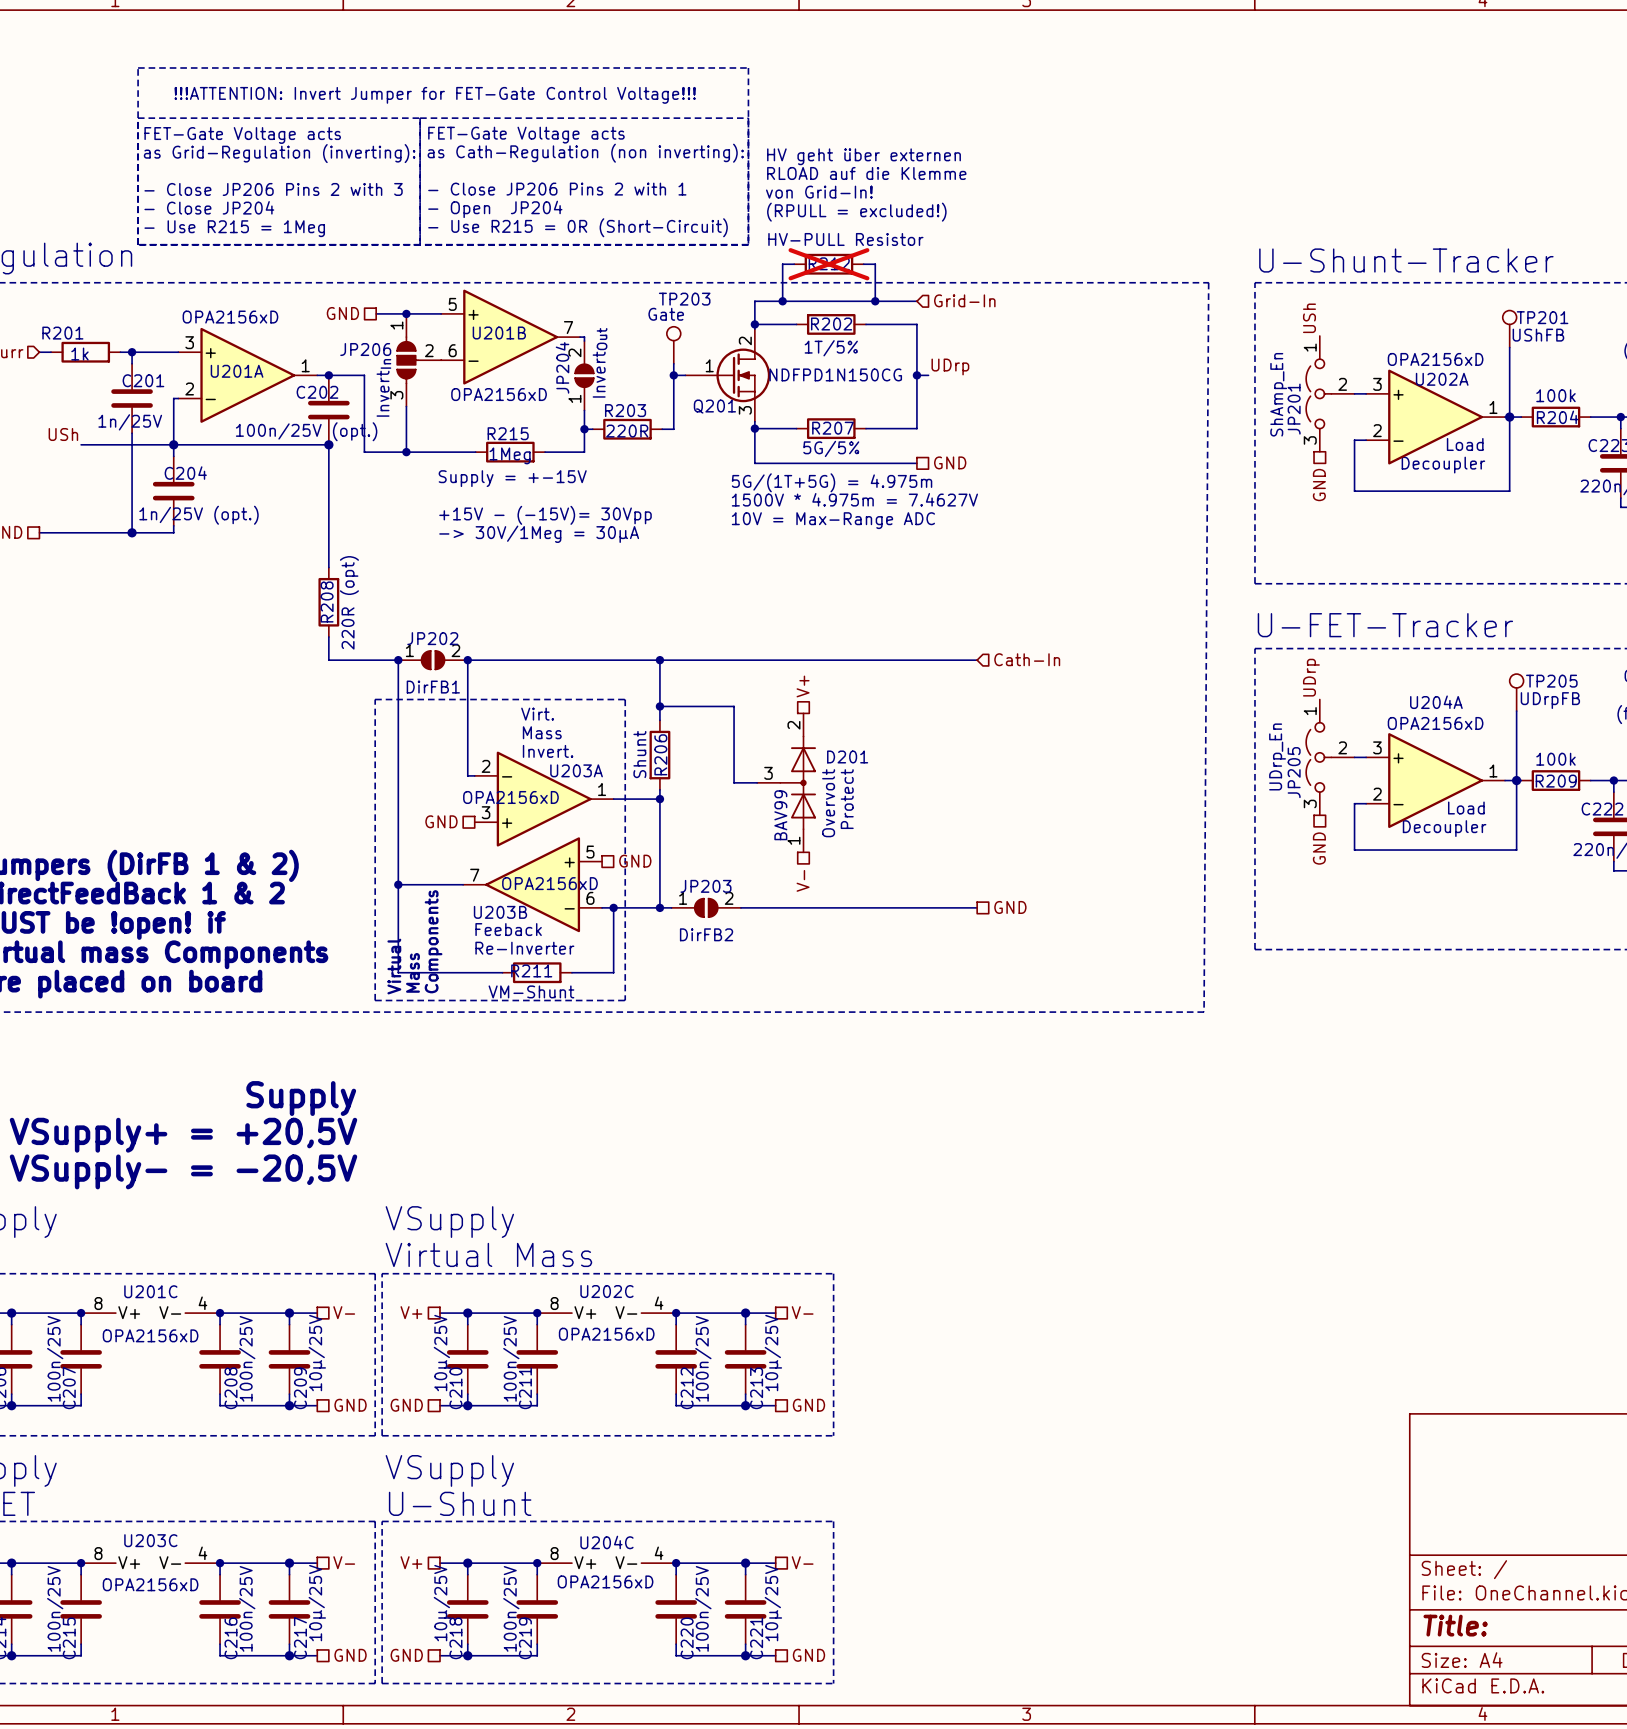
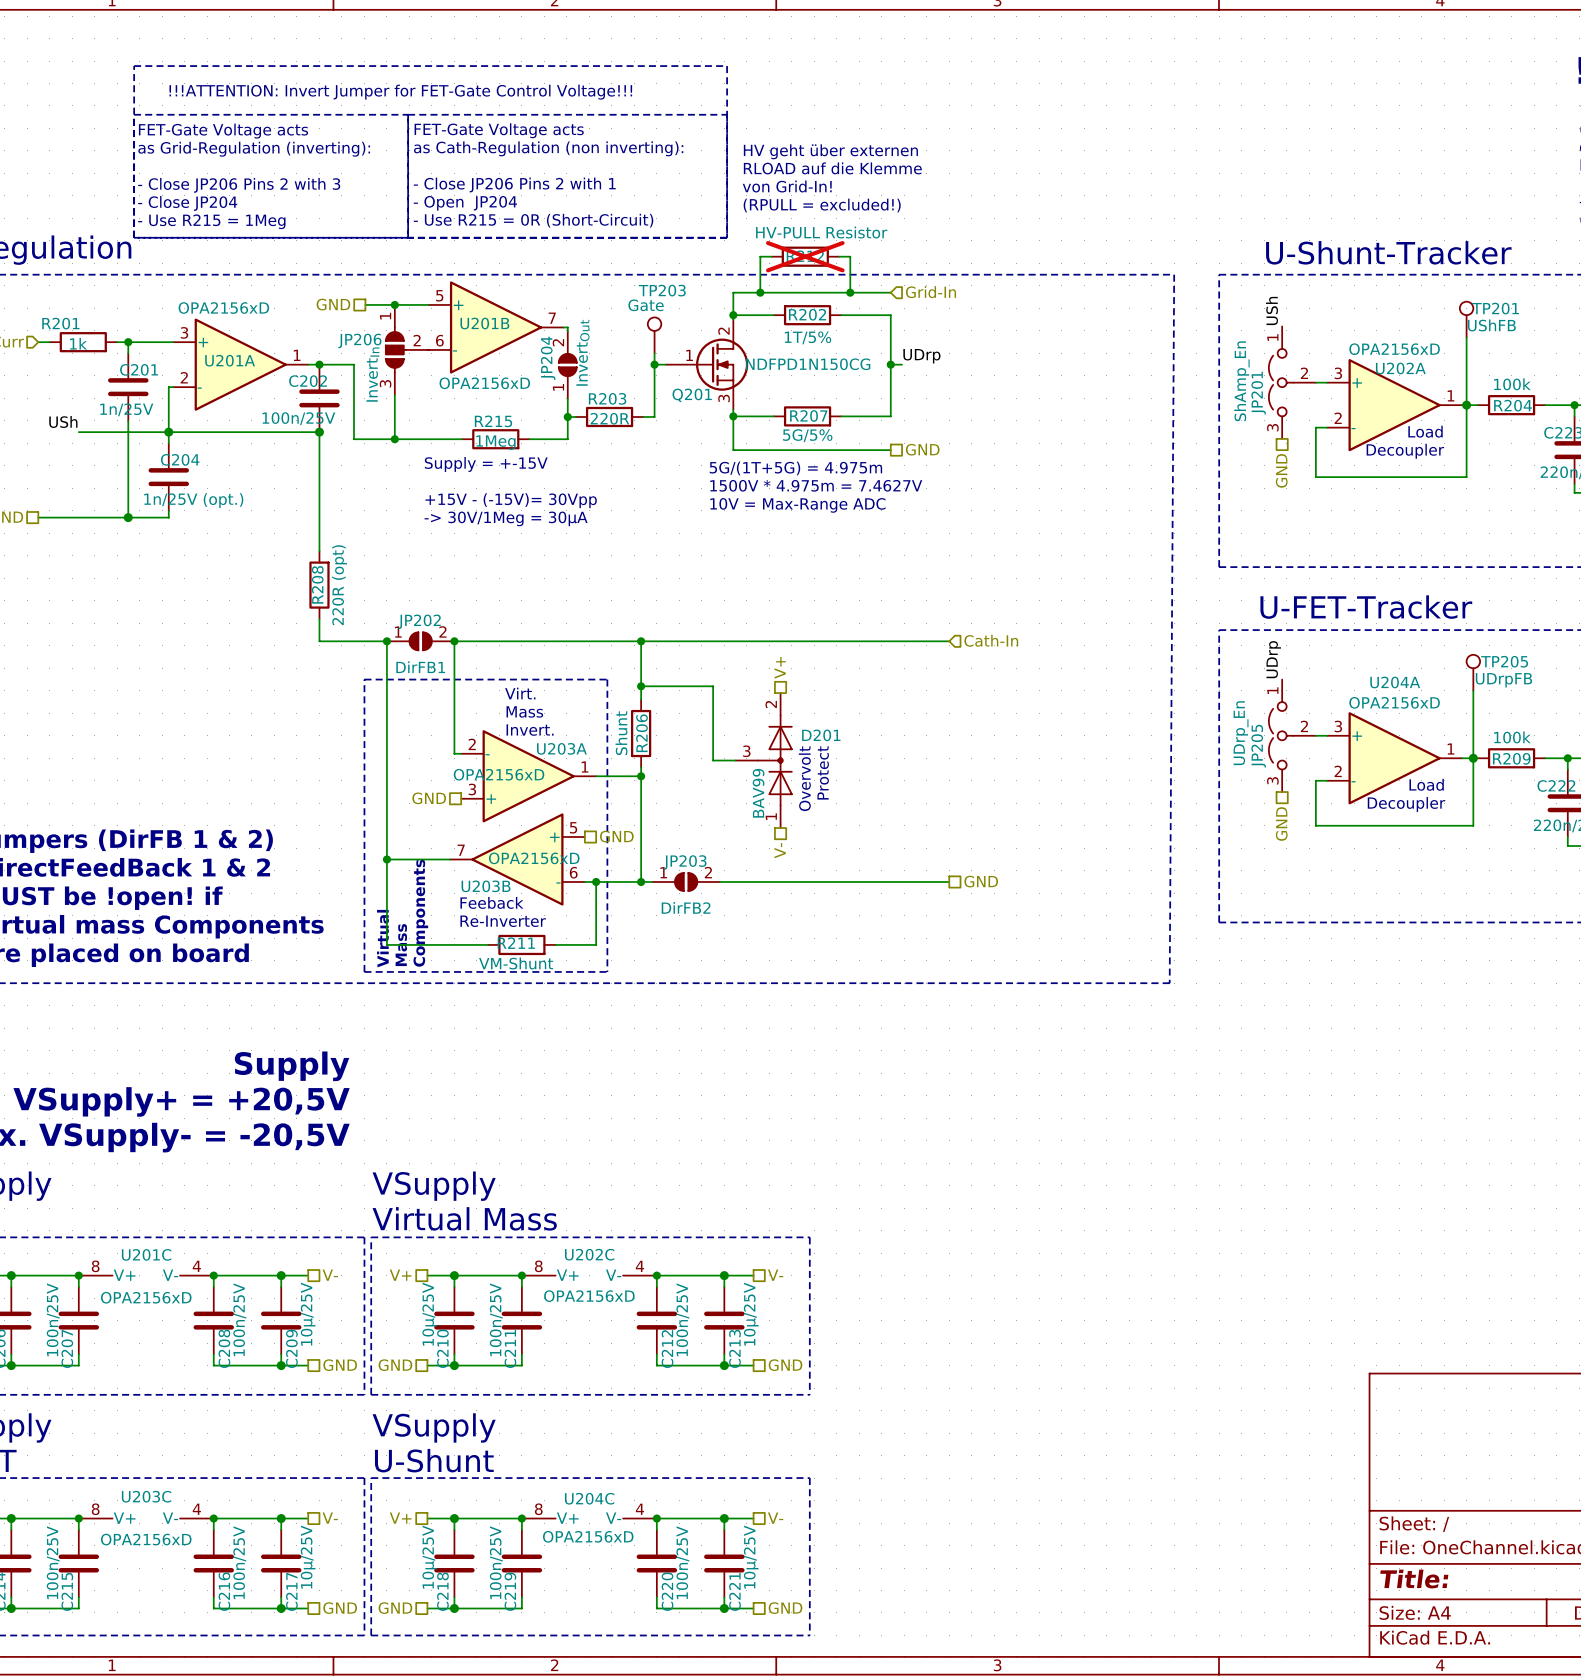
C202 value: 100n/25V (opt.) (306, 431) -> 100n/25V (298, 418)

